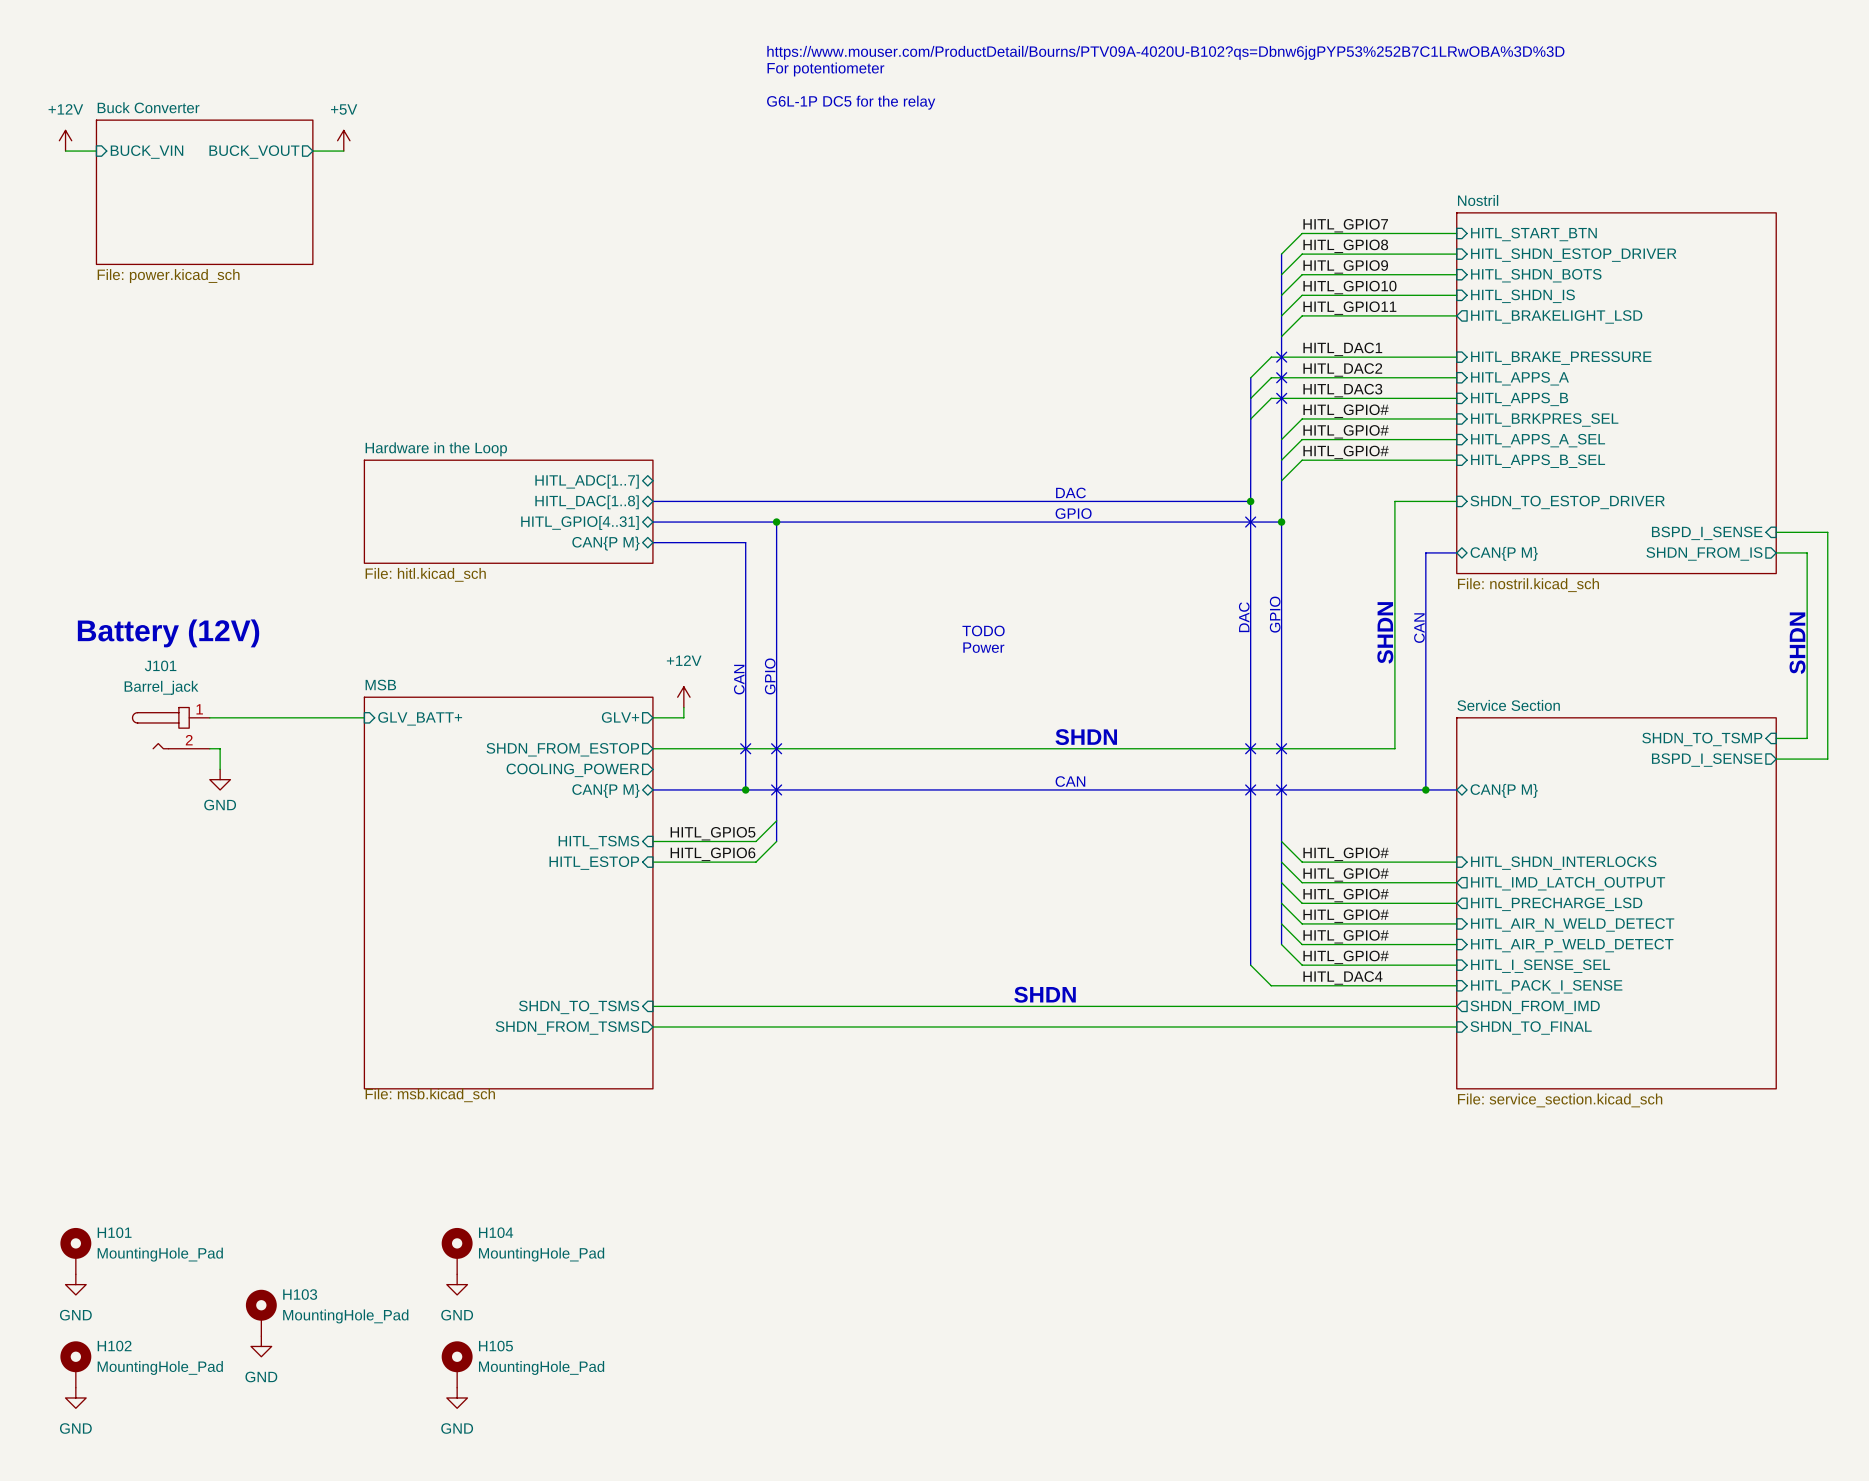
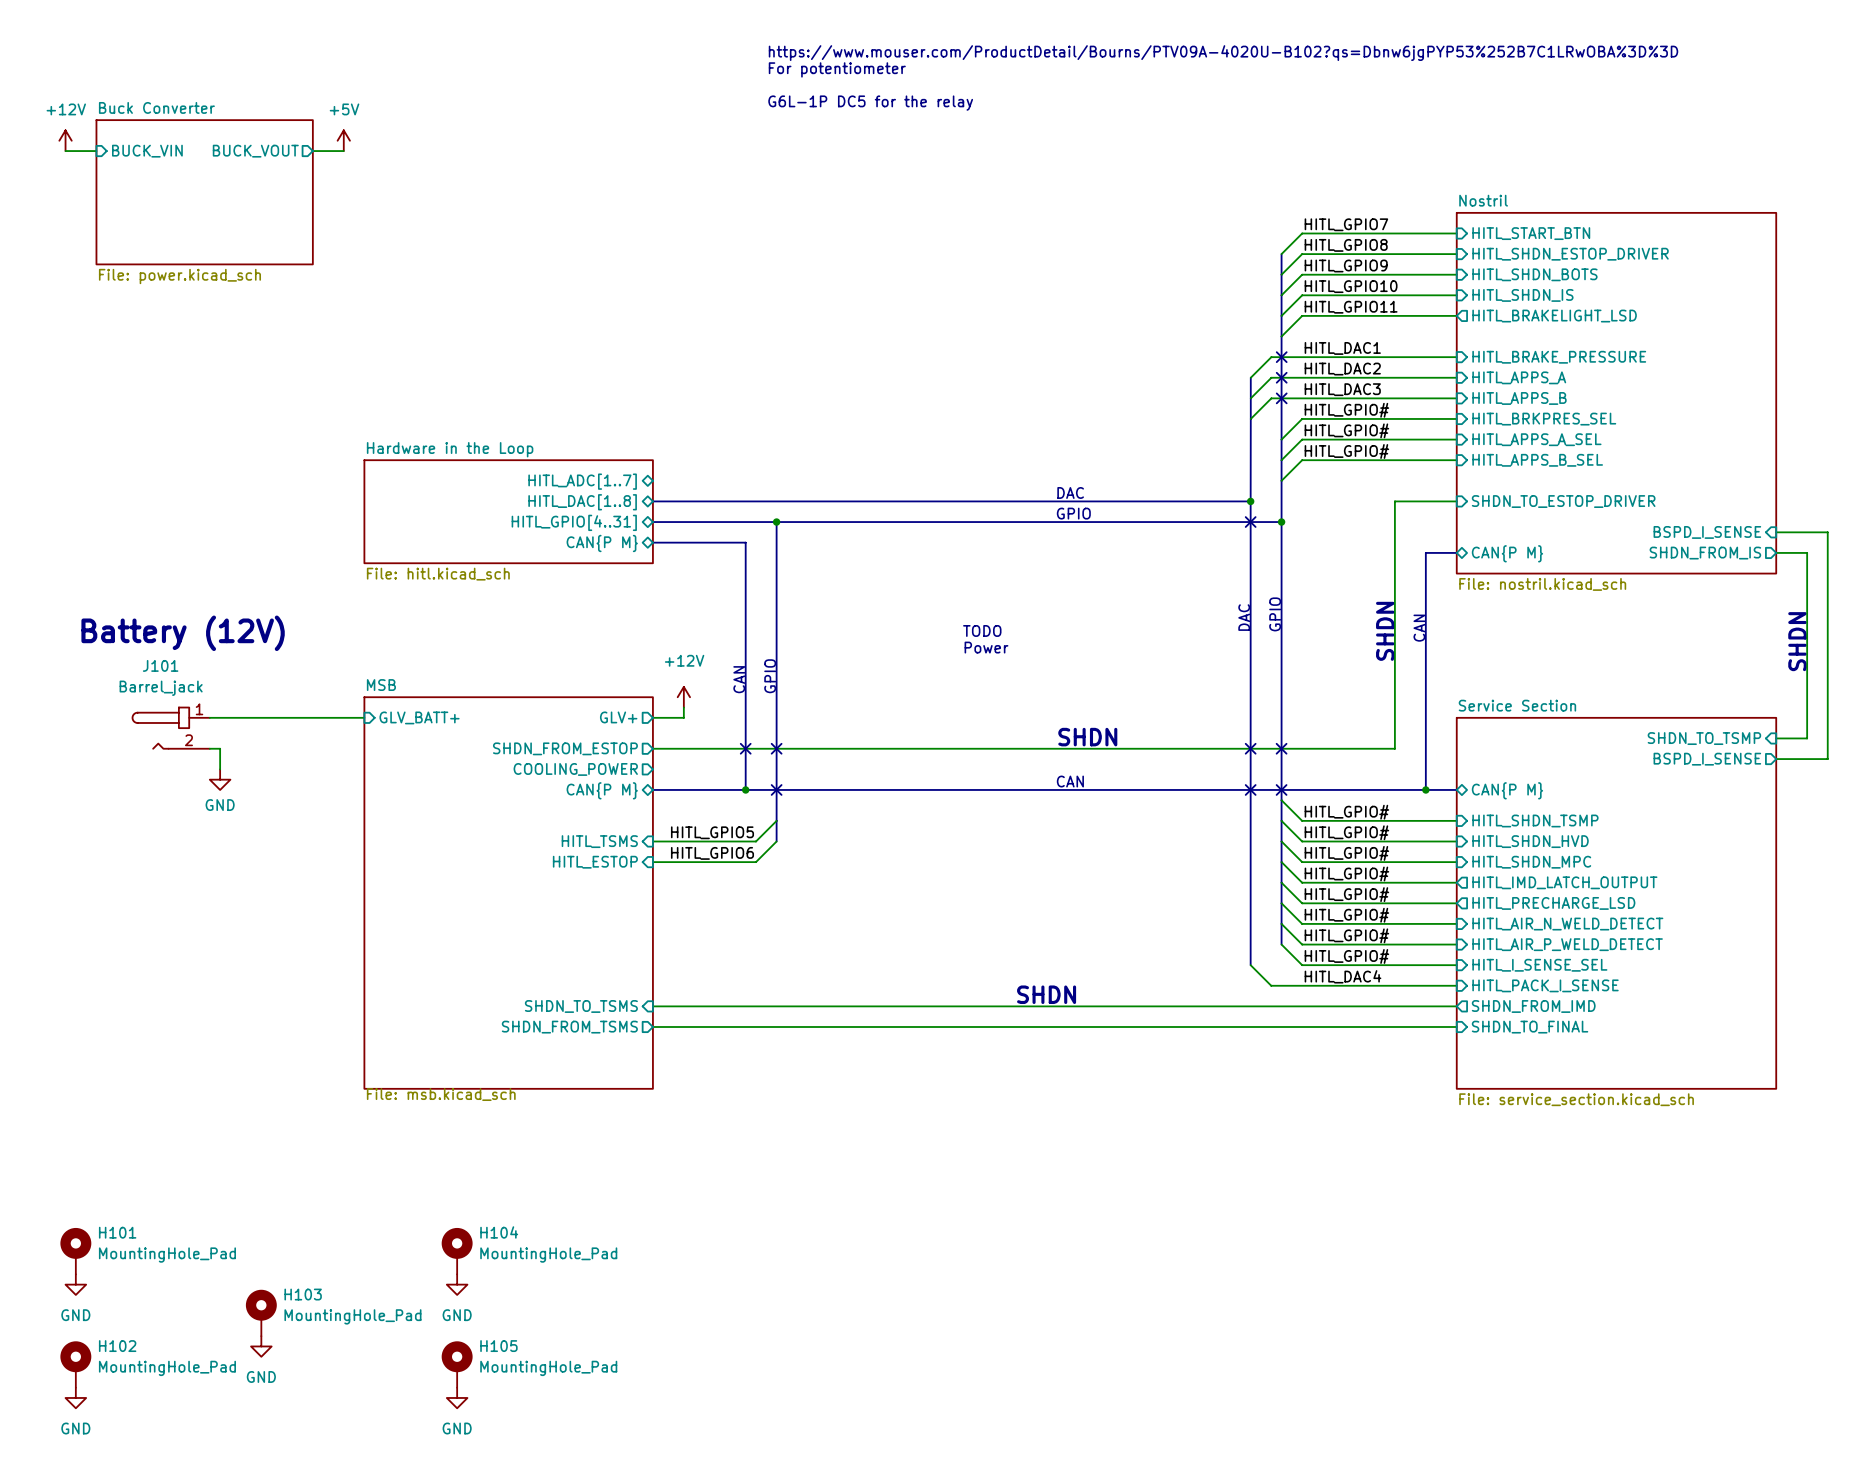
wire: none -> (1281, 800) (1302, 820) (1456, 820)
label: none -> HITL_GPIO# (1346, 812)
wire: none -> (1281, 820) (1302, 841) (1456, 841)
sheet pin: none -> HITL_SHDN_TSMP (1535, 820)
label: none -> HITL_GPIO# (1346, 832)
sheet pin: none -> HITL_SHDN_HVD (1530, 841)
sheet pin: HITL_SHDN_INTERLOCKS (1563, 863) -> HITL_SHDN_MPC (1531, 862)

